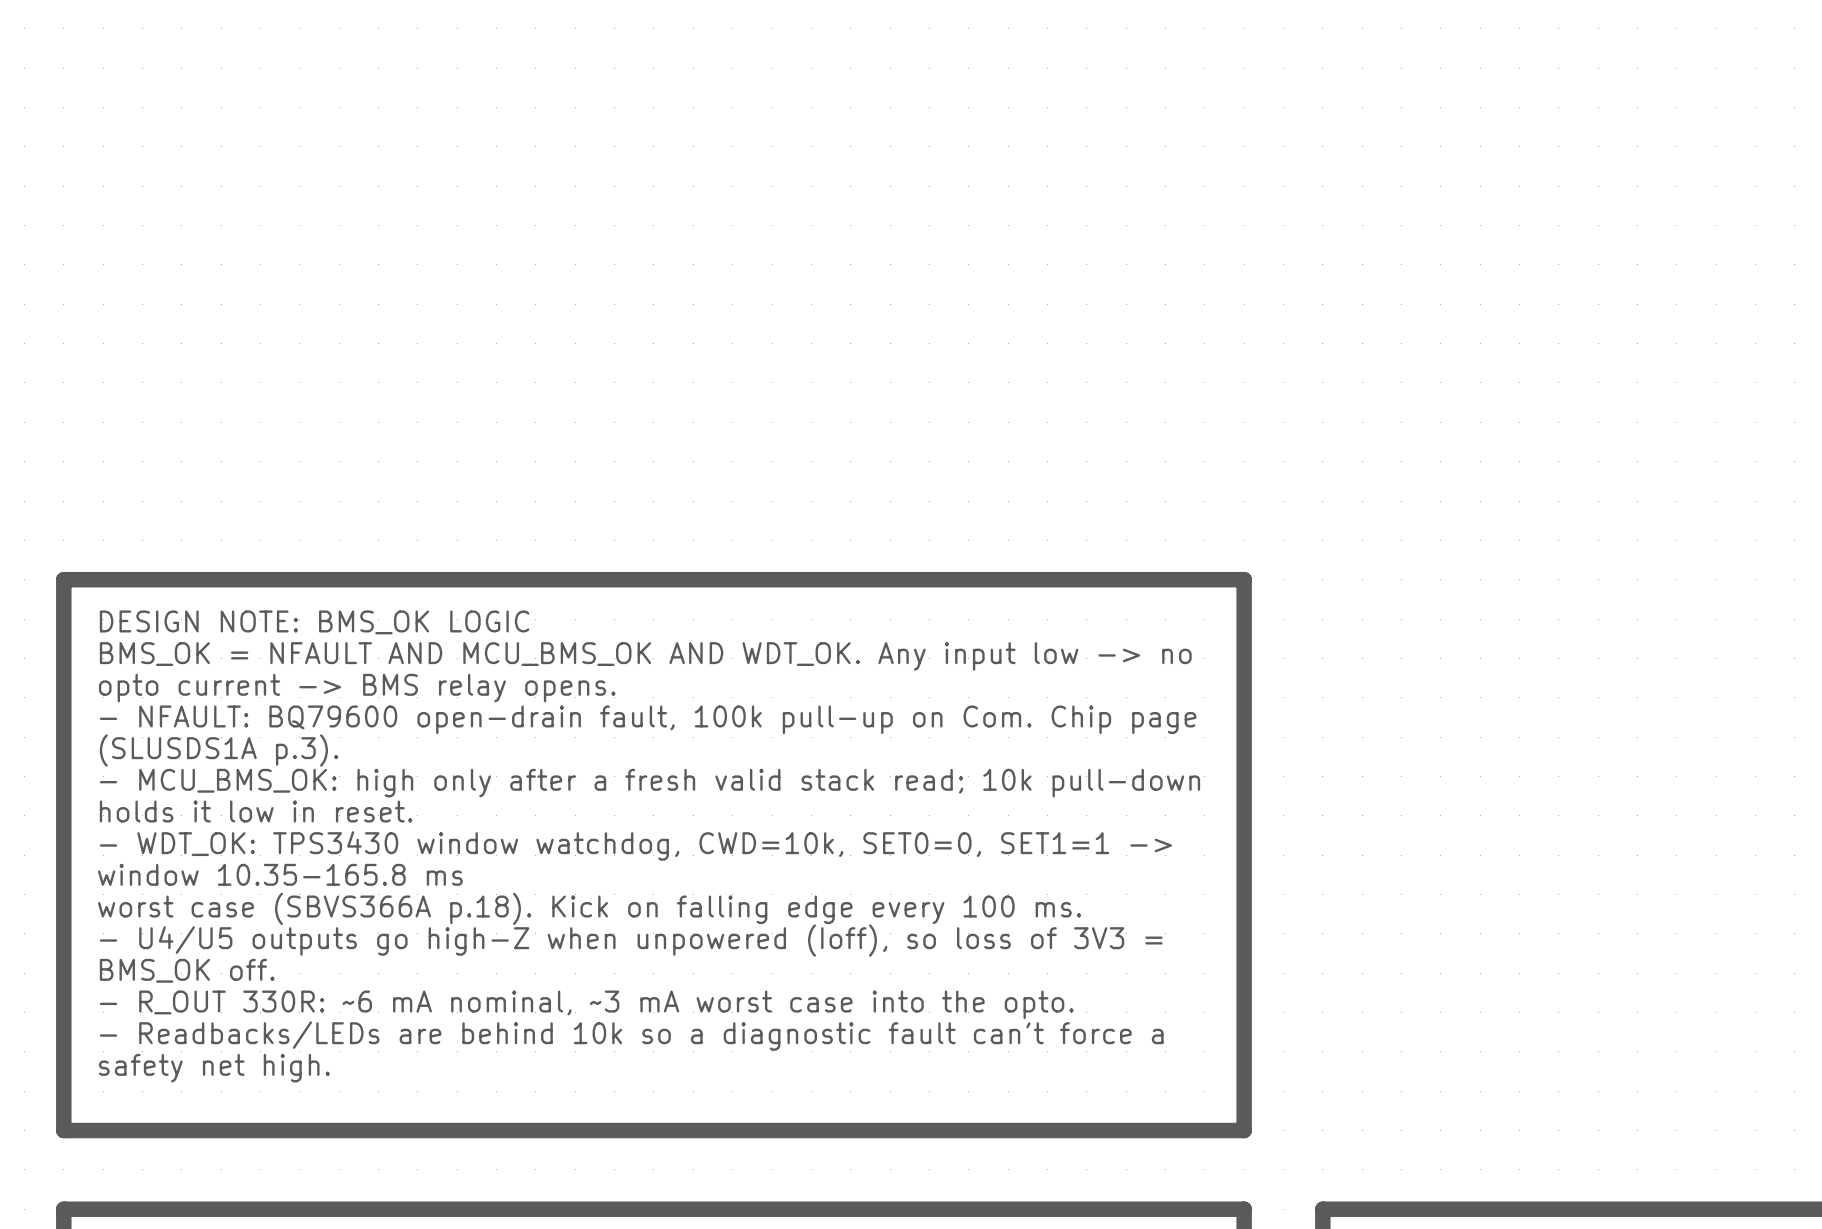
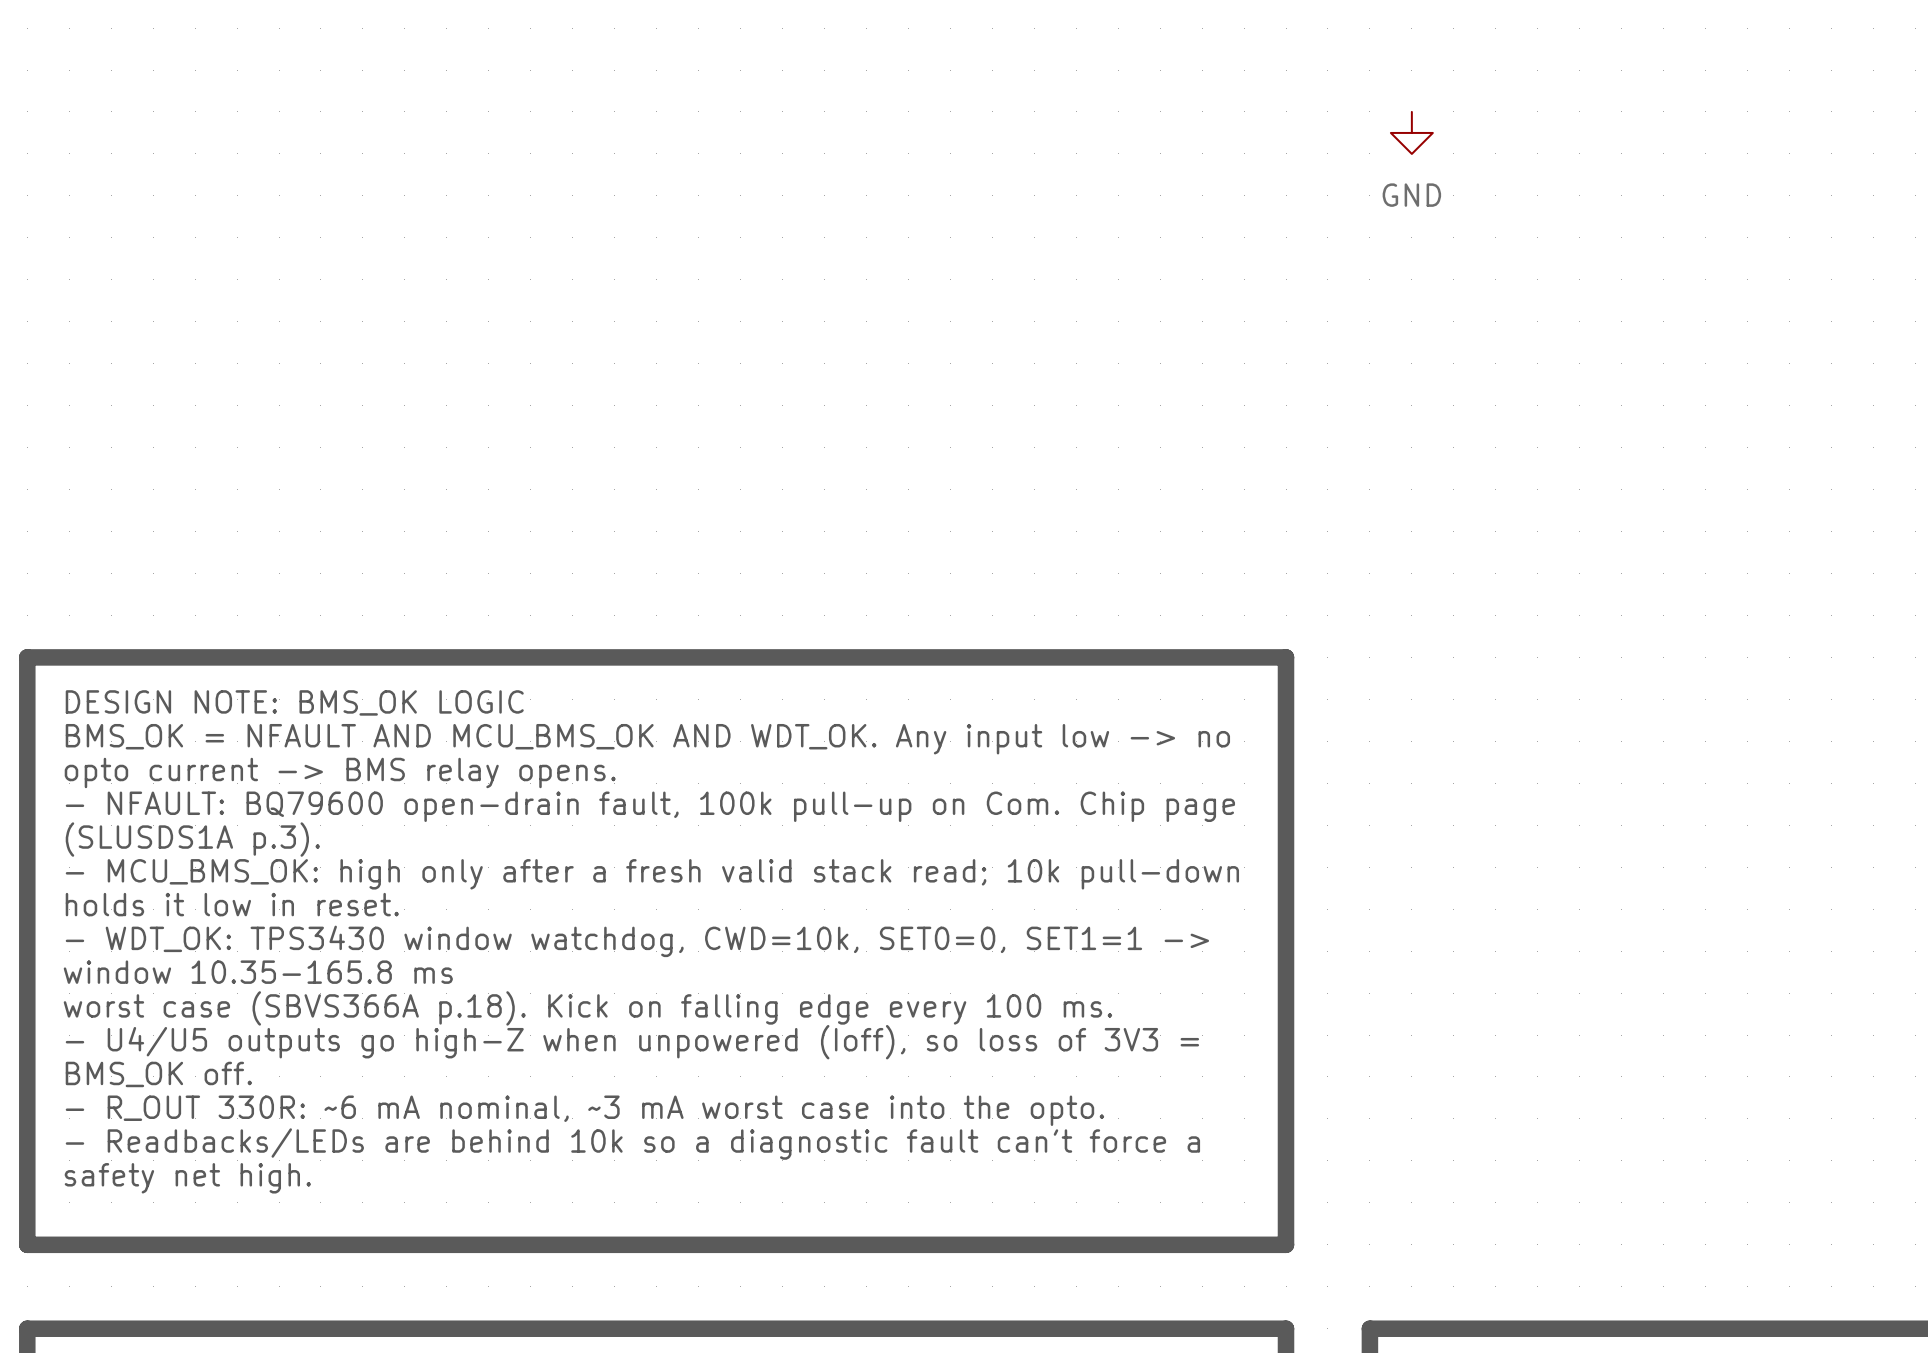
power symbol: none -> GND (1411, 132)

